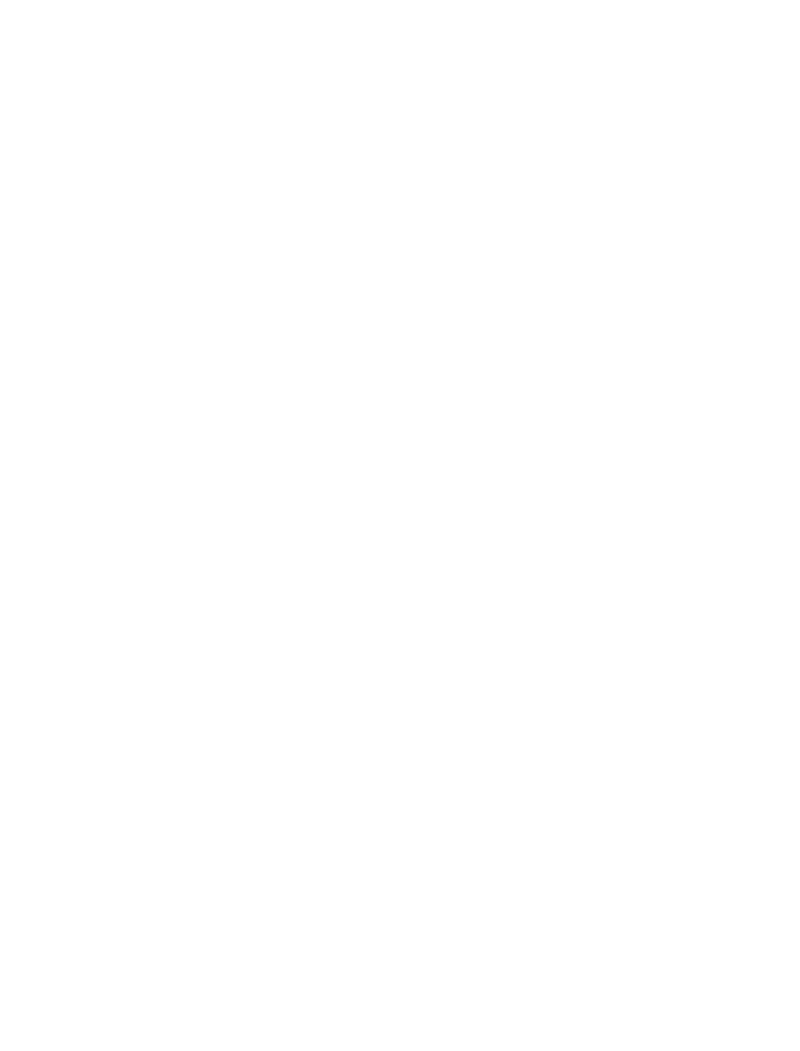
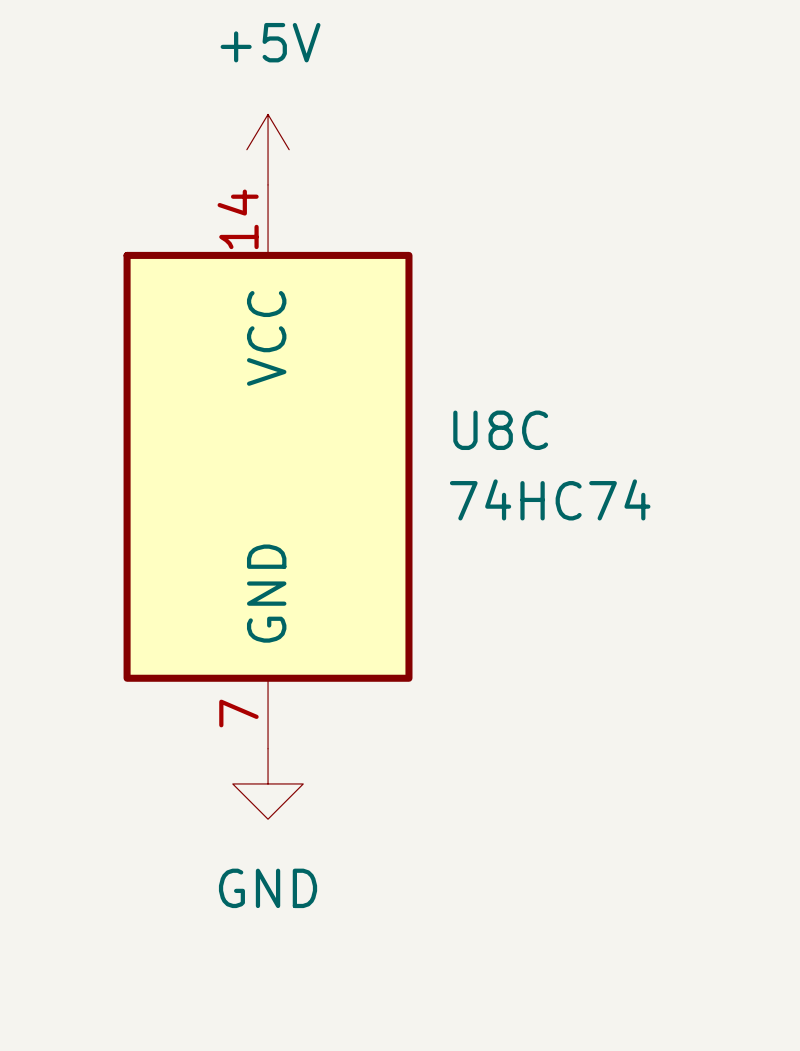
power symbol: none -> +5V (268, 149)
U8C: none -> 74HC74 (268, 466)
power symbol: none -> GND (268, 783)

